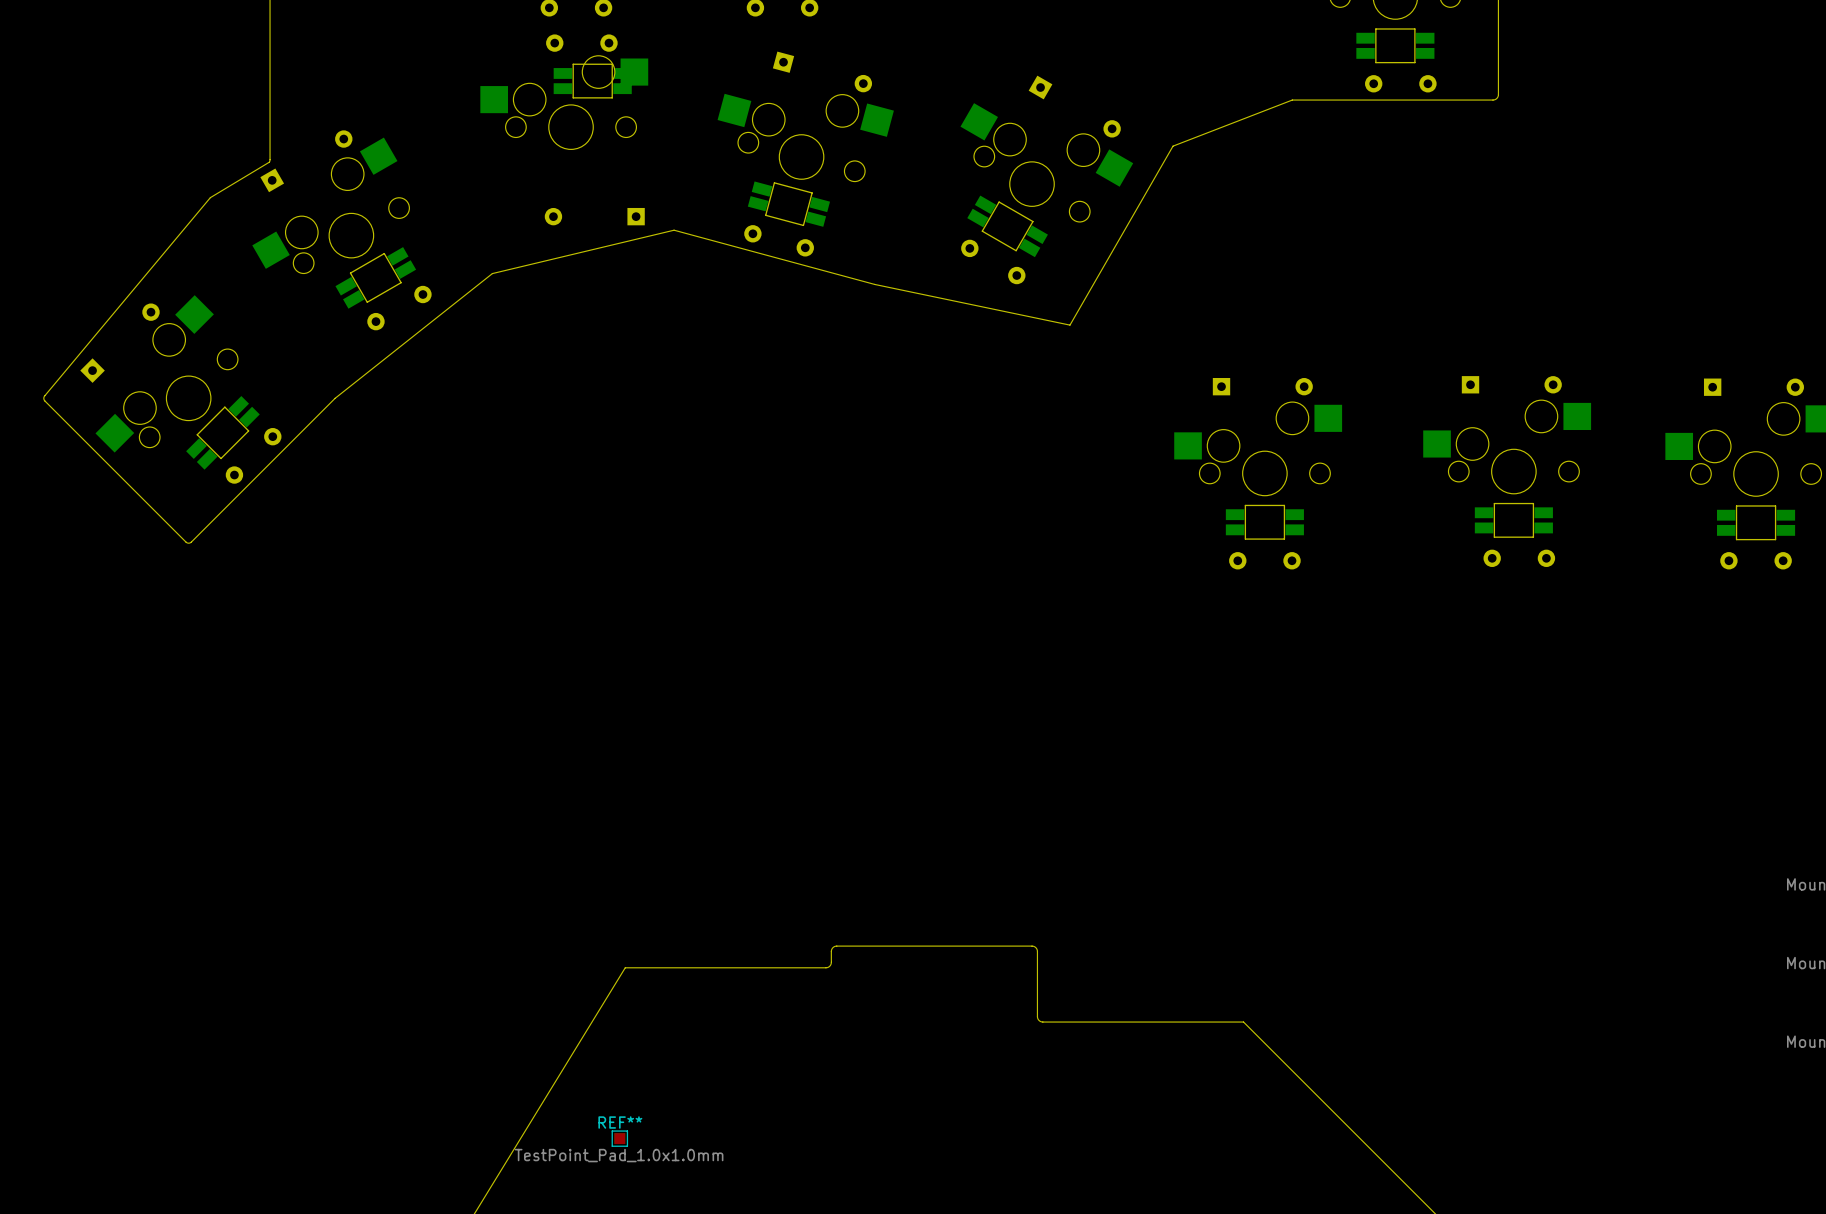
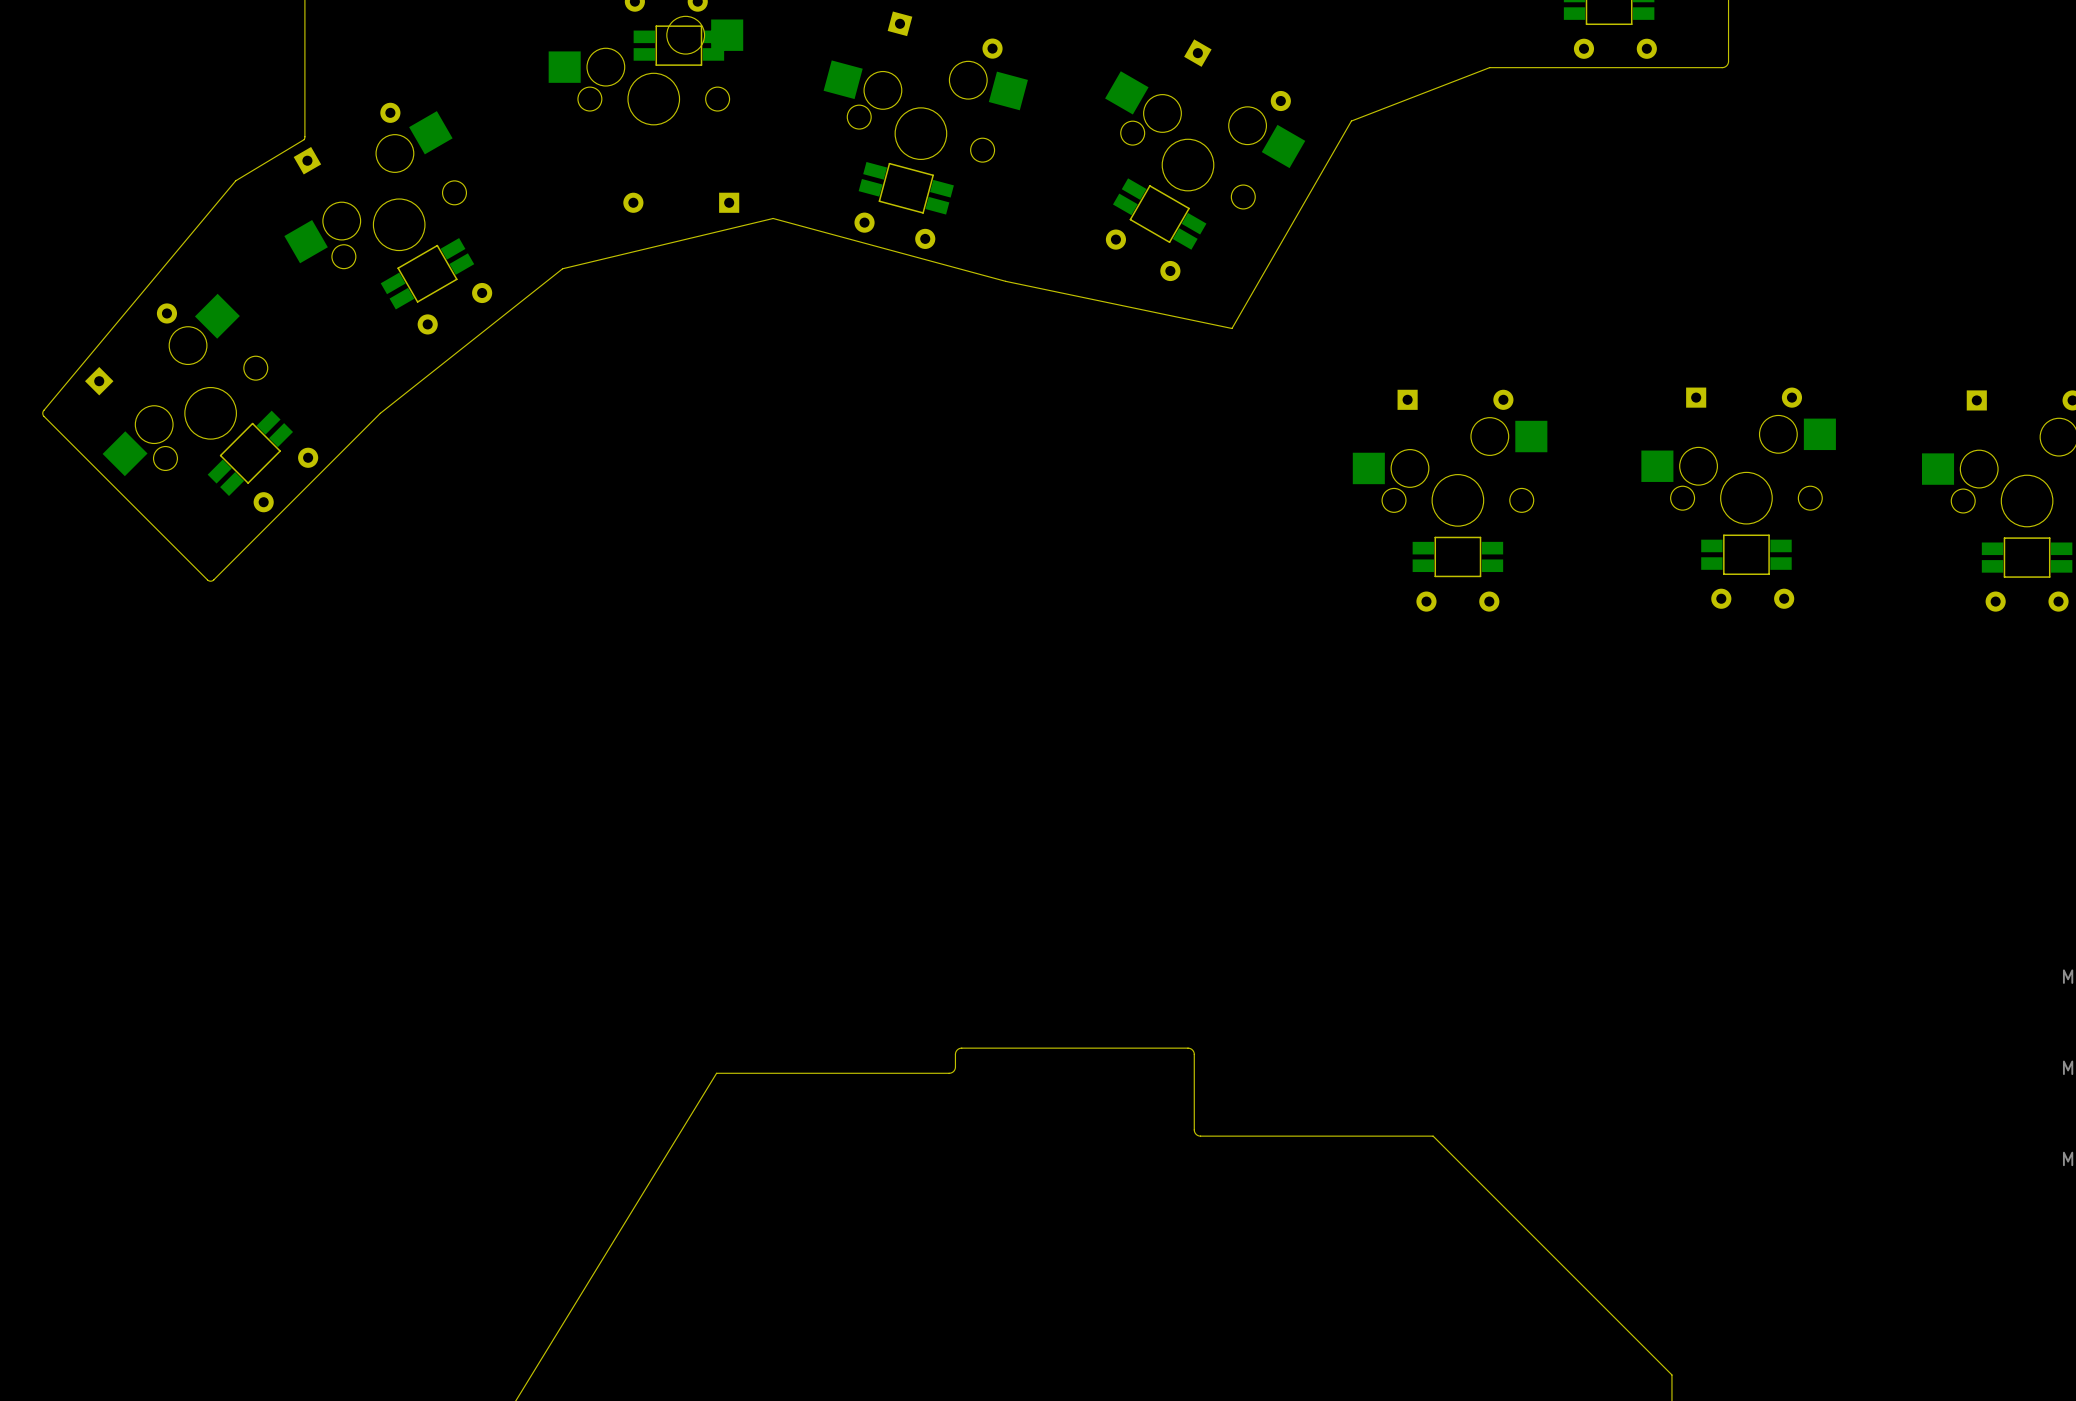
REF**: TestPoint_Pad_1.0x1.0mm (619, 1138) -> none

